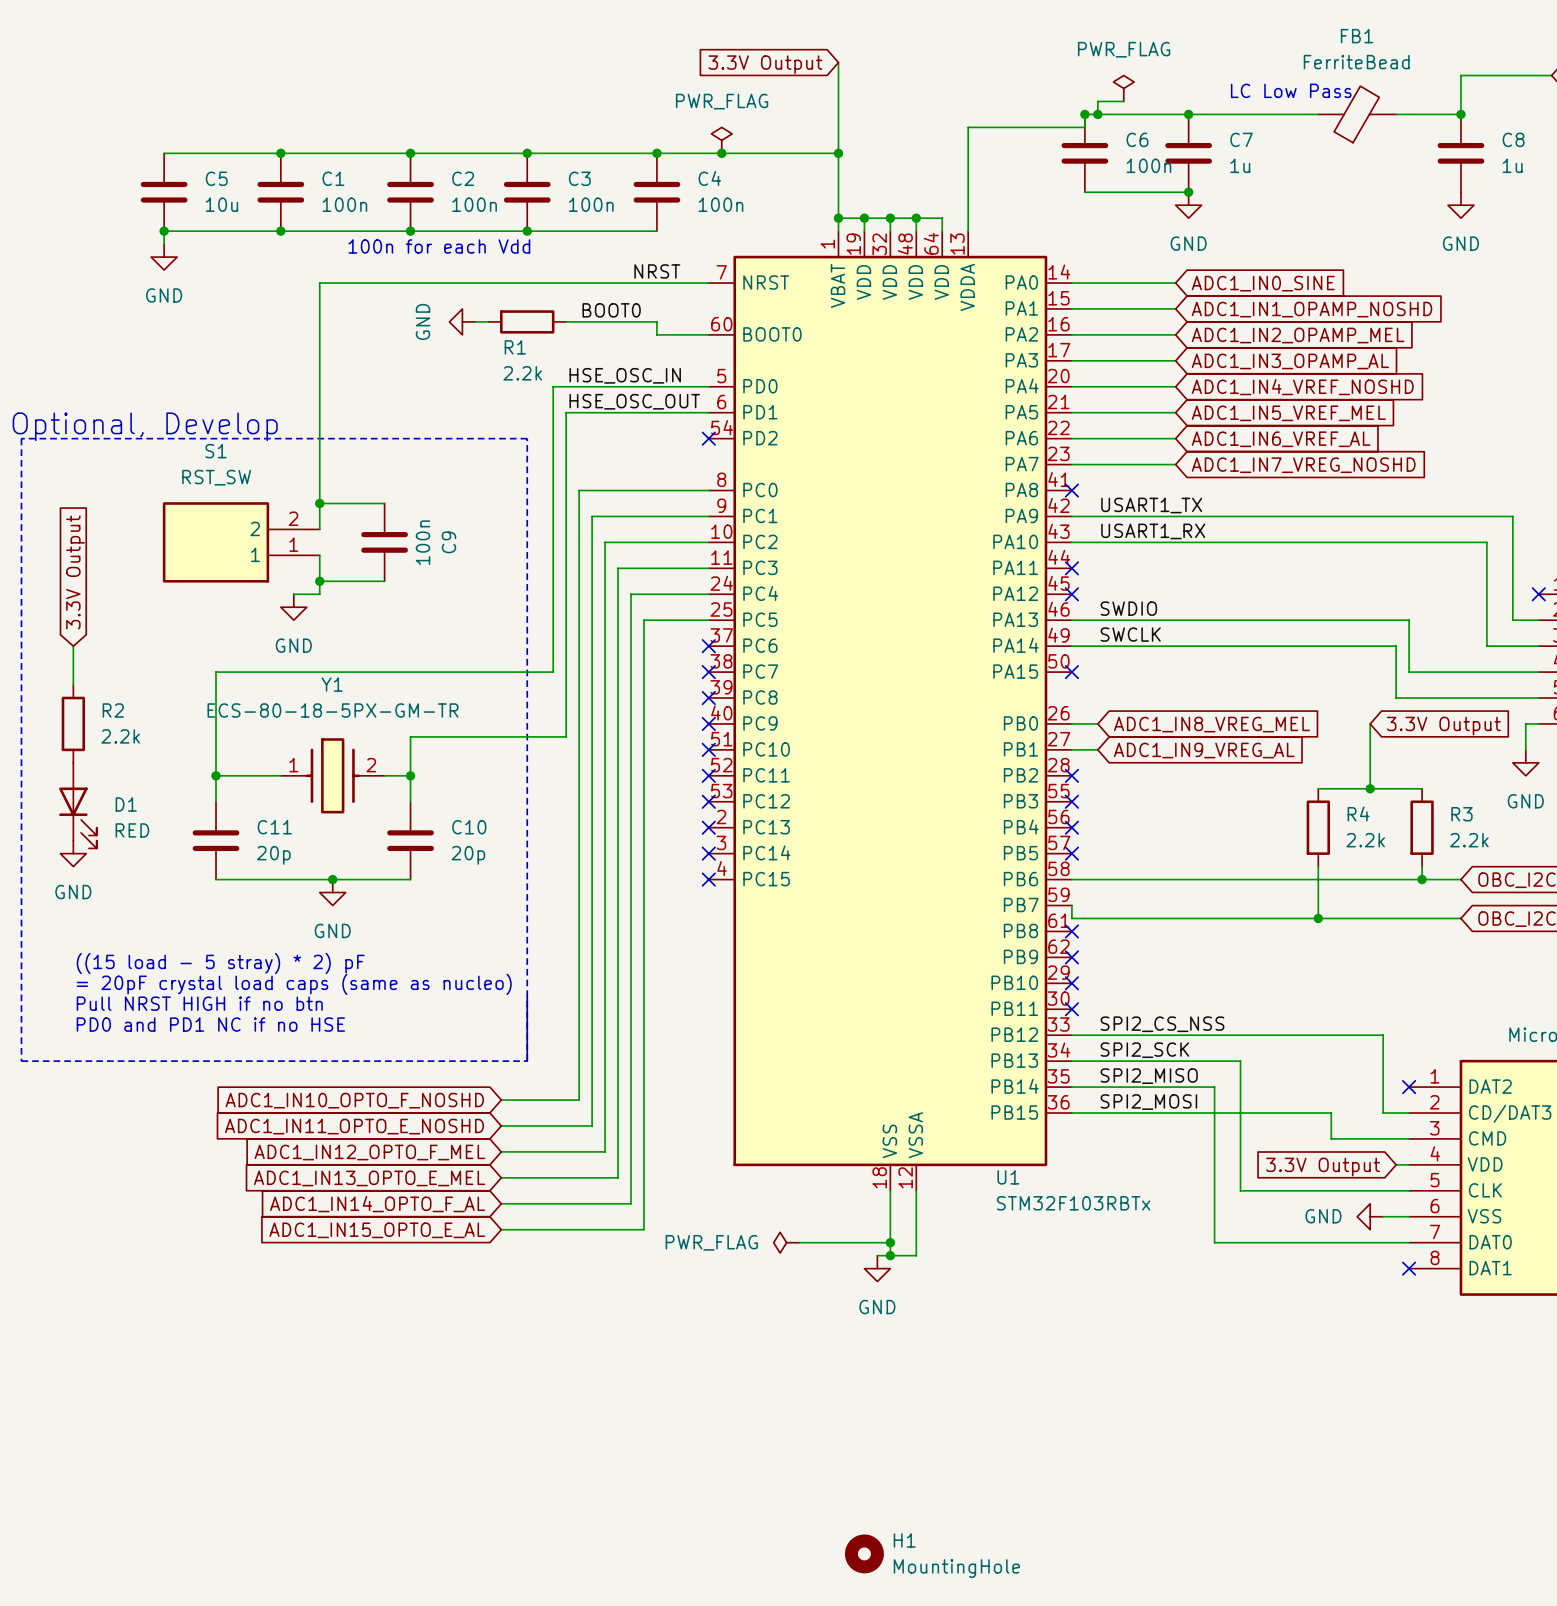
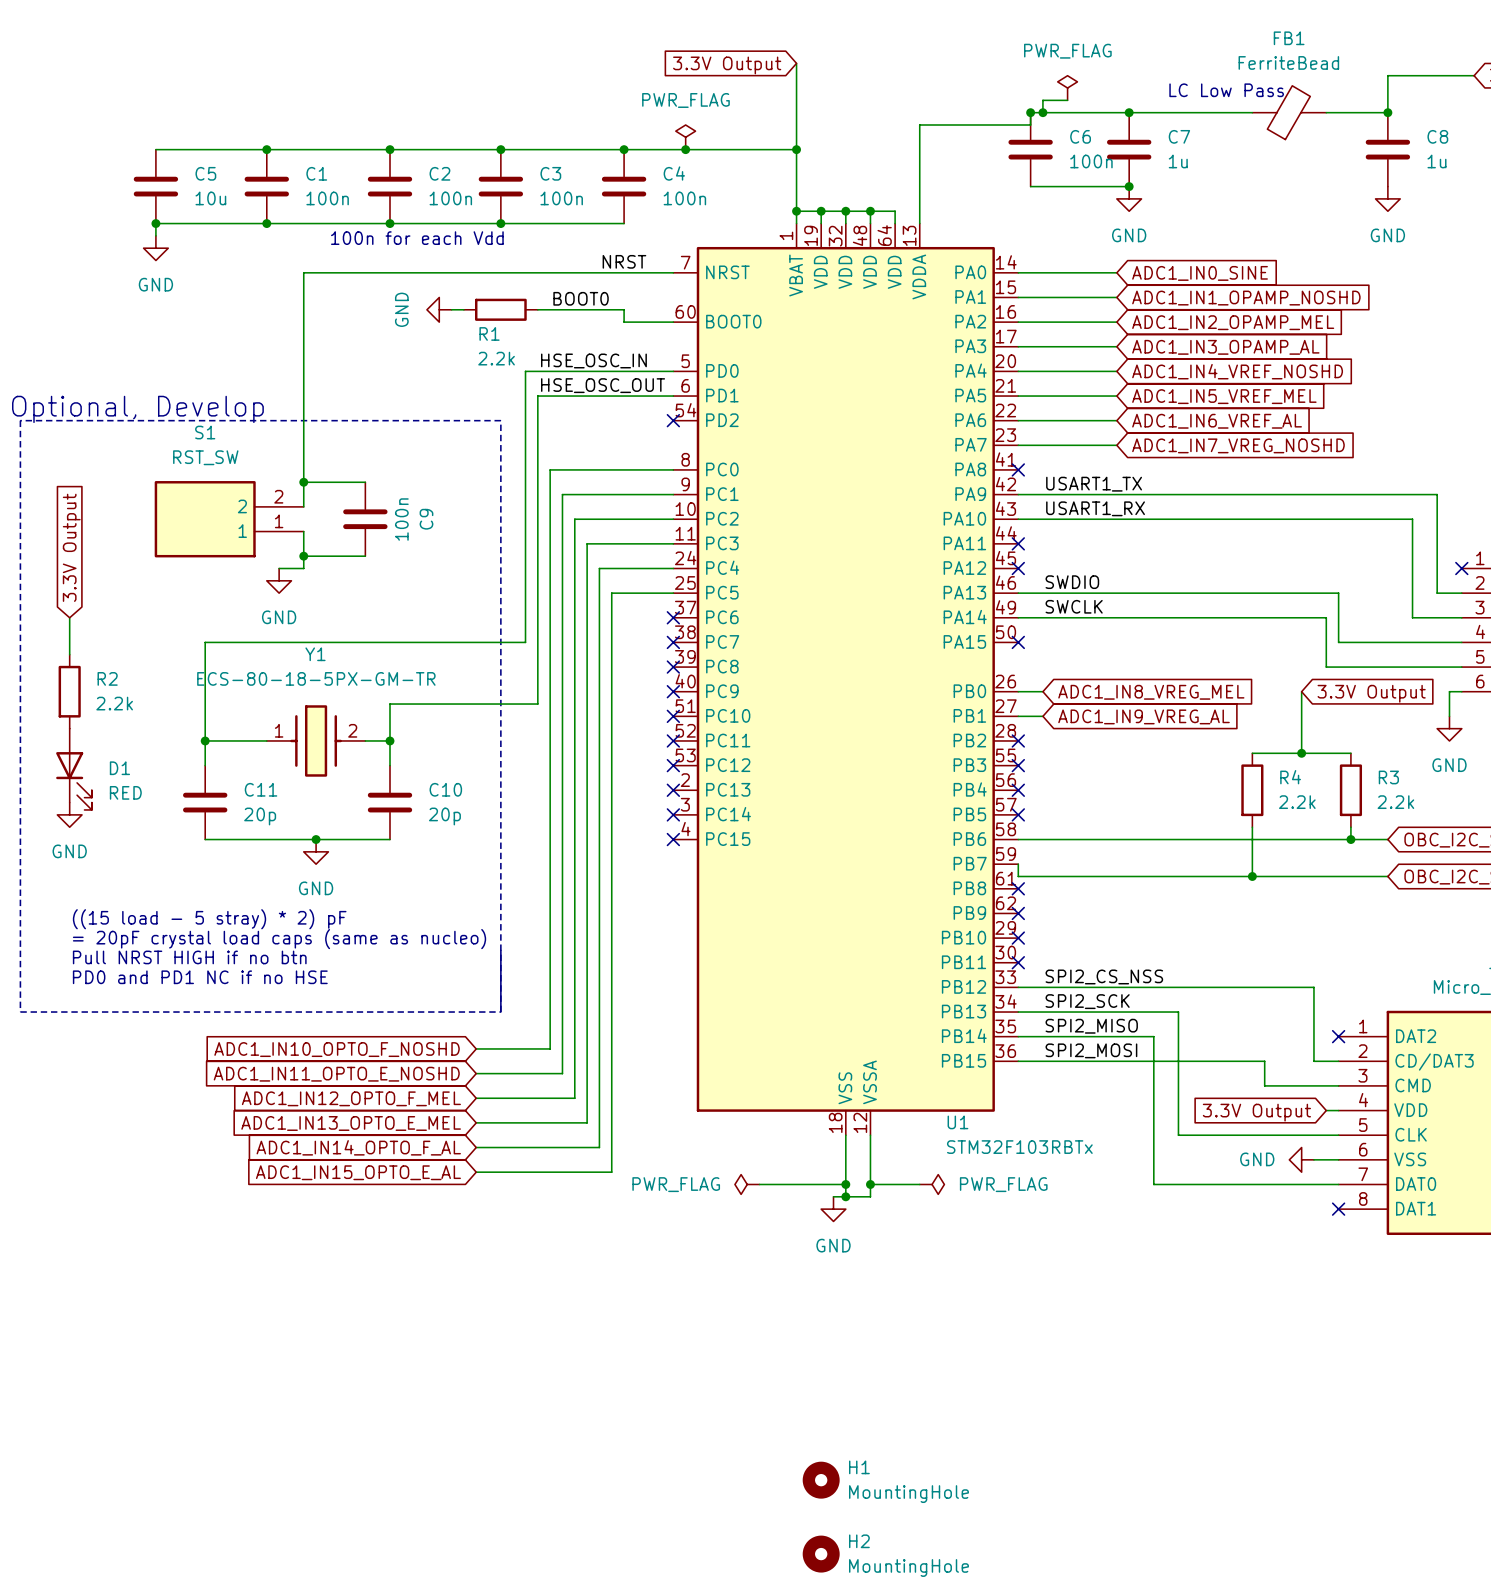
wire: none -> (870, 1184) (919, 1184)
junction: none -> (870, 1184)
power symbol: none -> PWR_FLAG (932, 1184)

